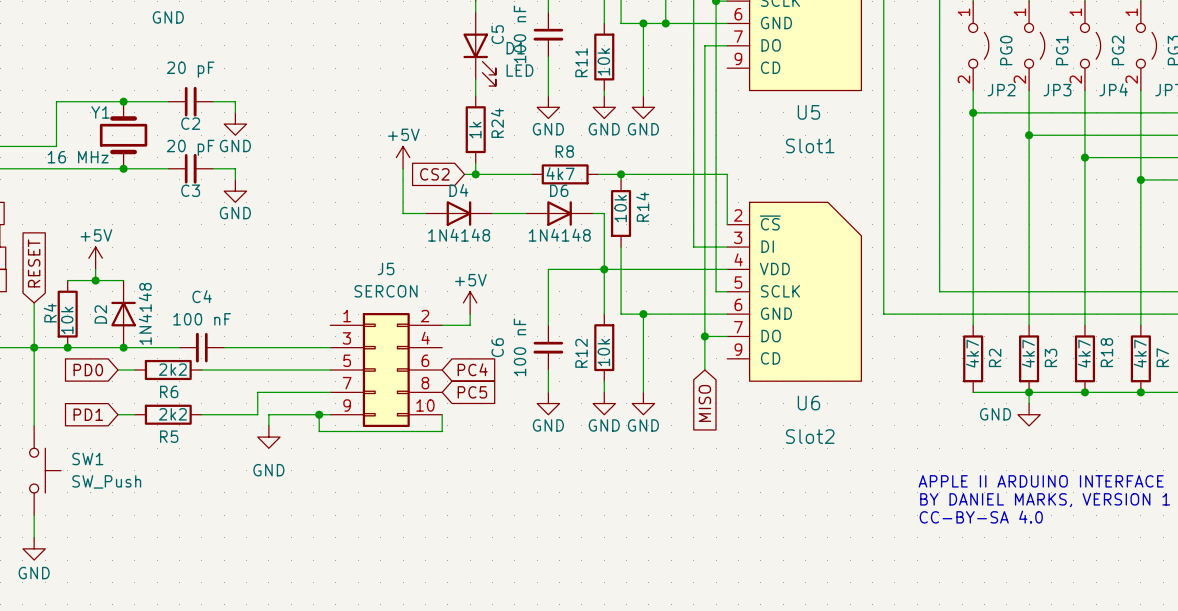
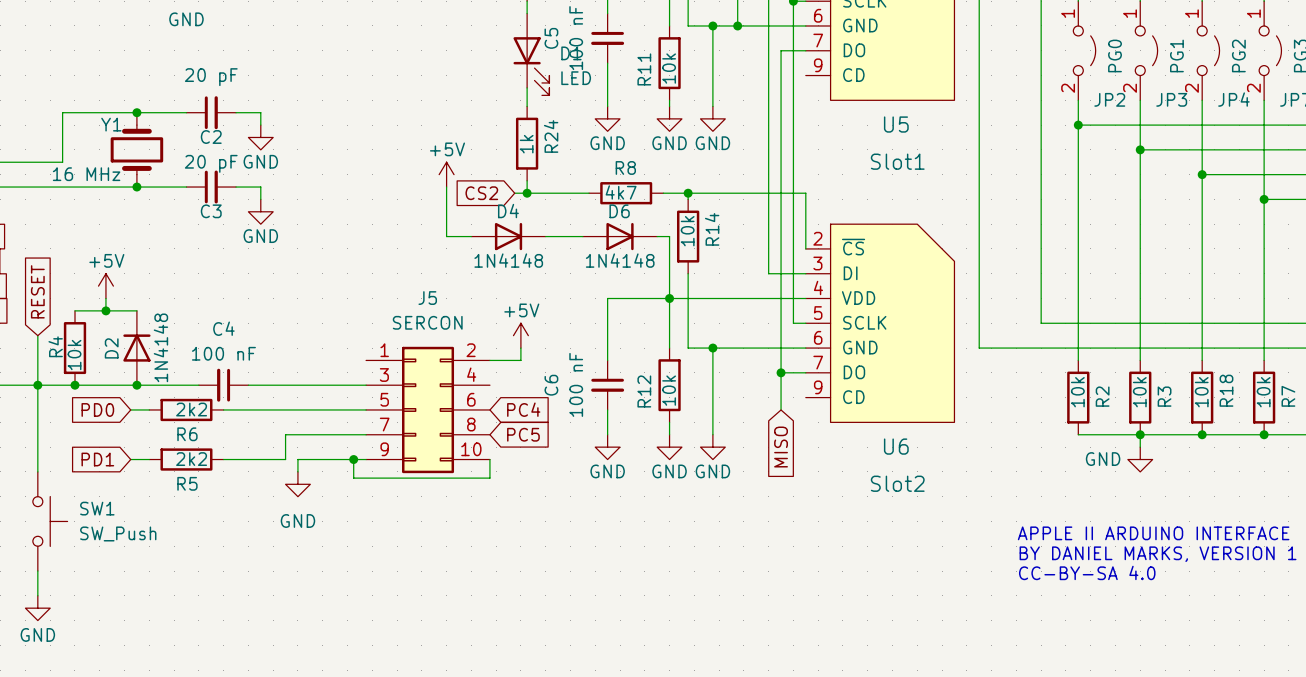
R2 value: 4k7 (972, 353) -> 10k (1077, 392)
R3 value: 4k7 (1028, 353) -> 10k (1139, 392)
R18 value: 4k7 (1084, 353) -> 10k (1201, 392)
R7 value: 4k7 (1140, 353) -> 10k (1263, 392)

